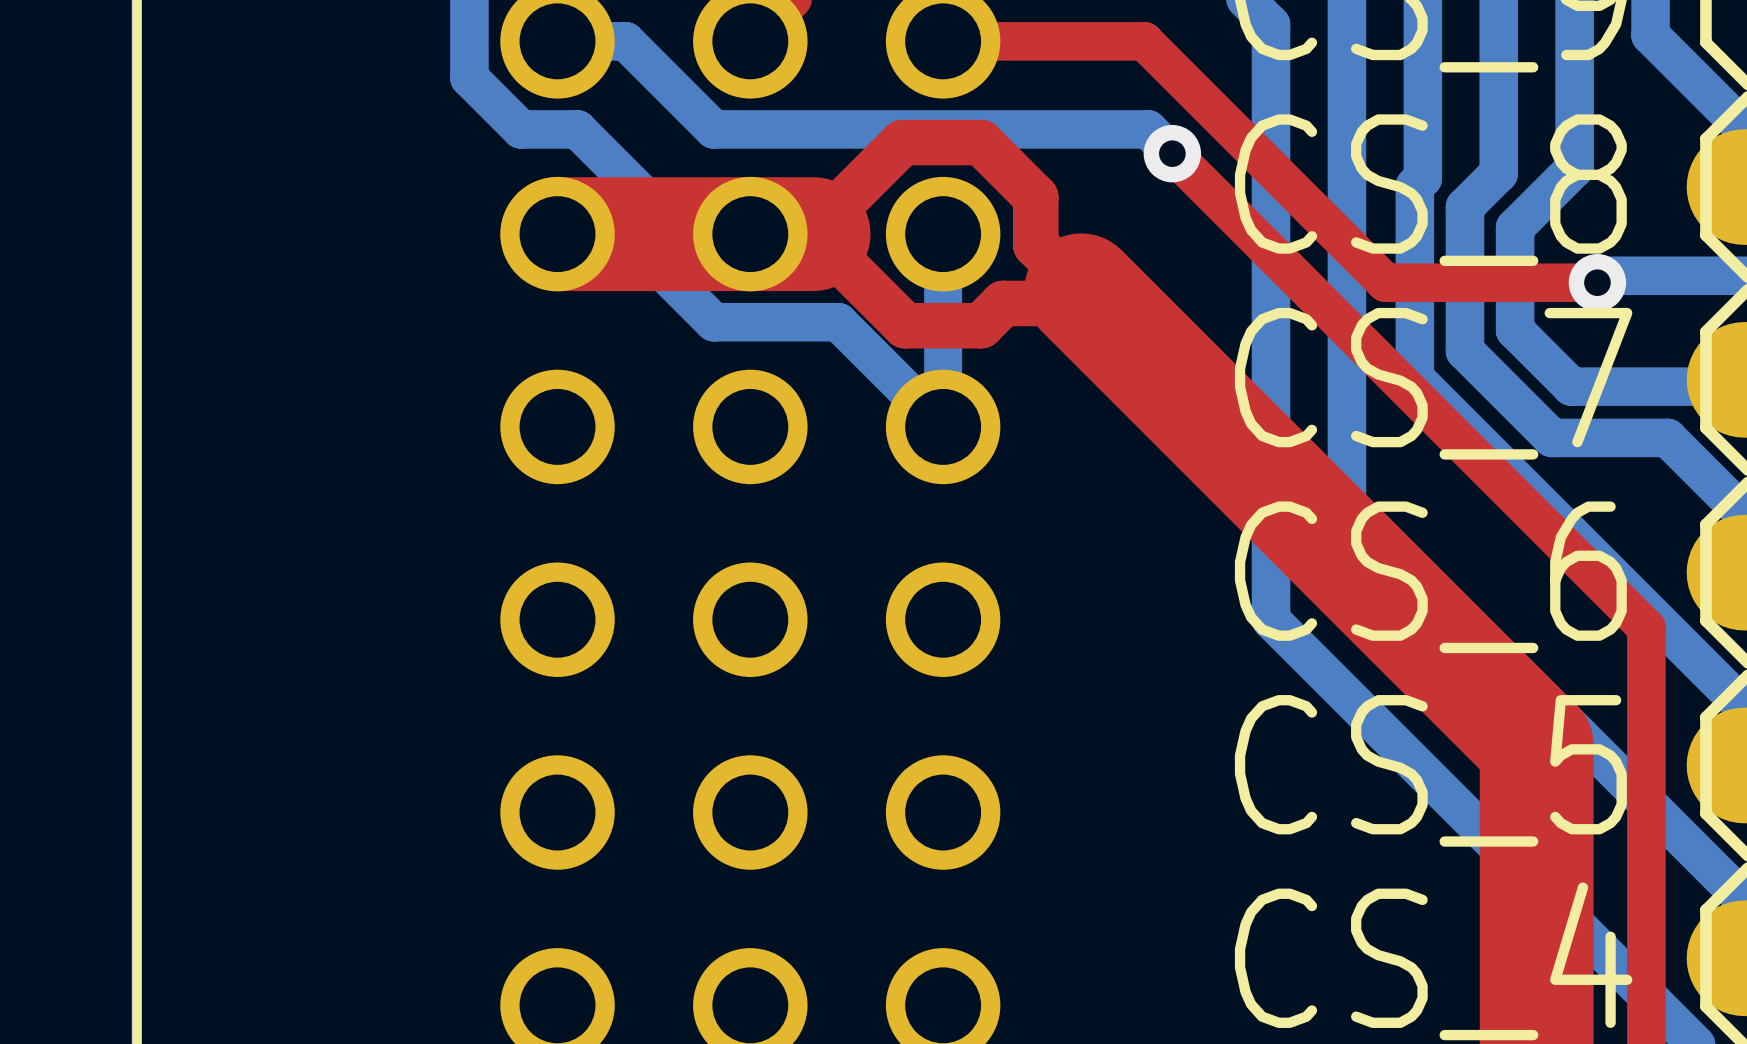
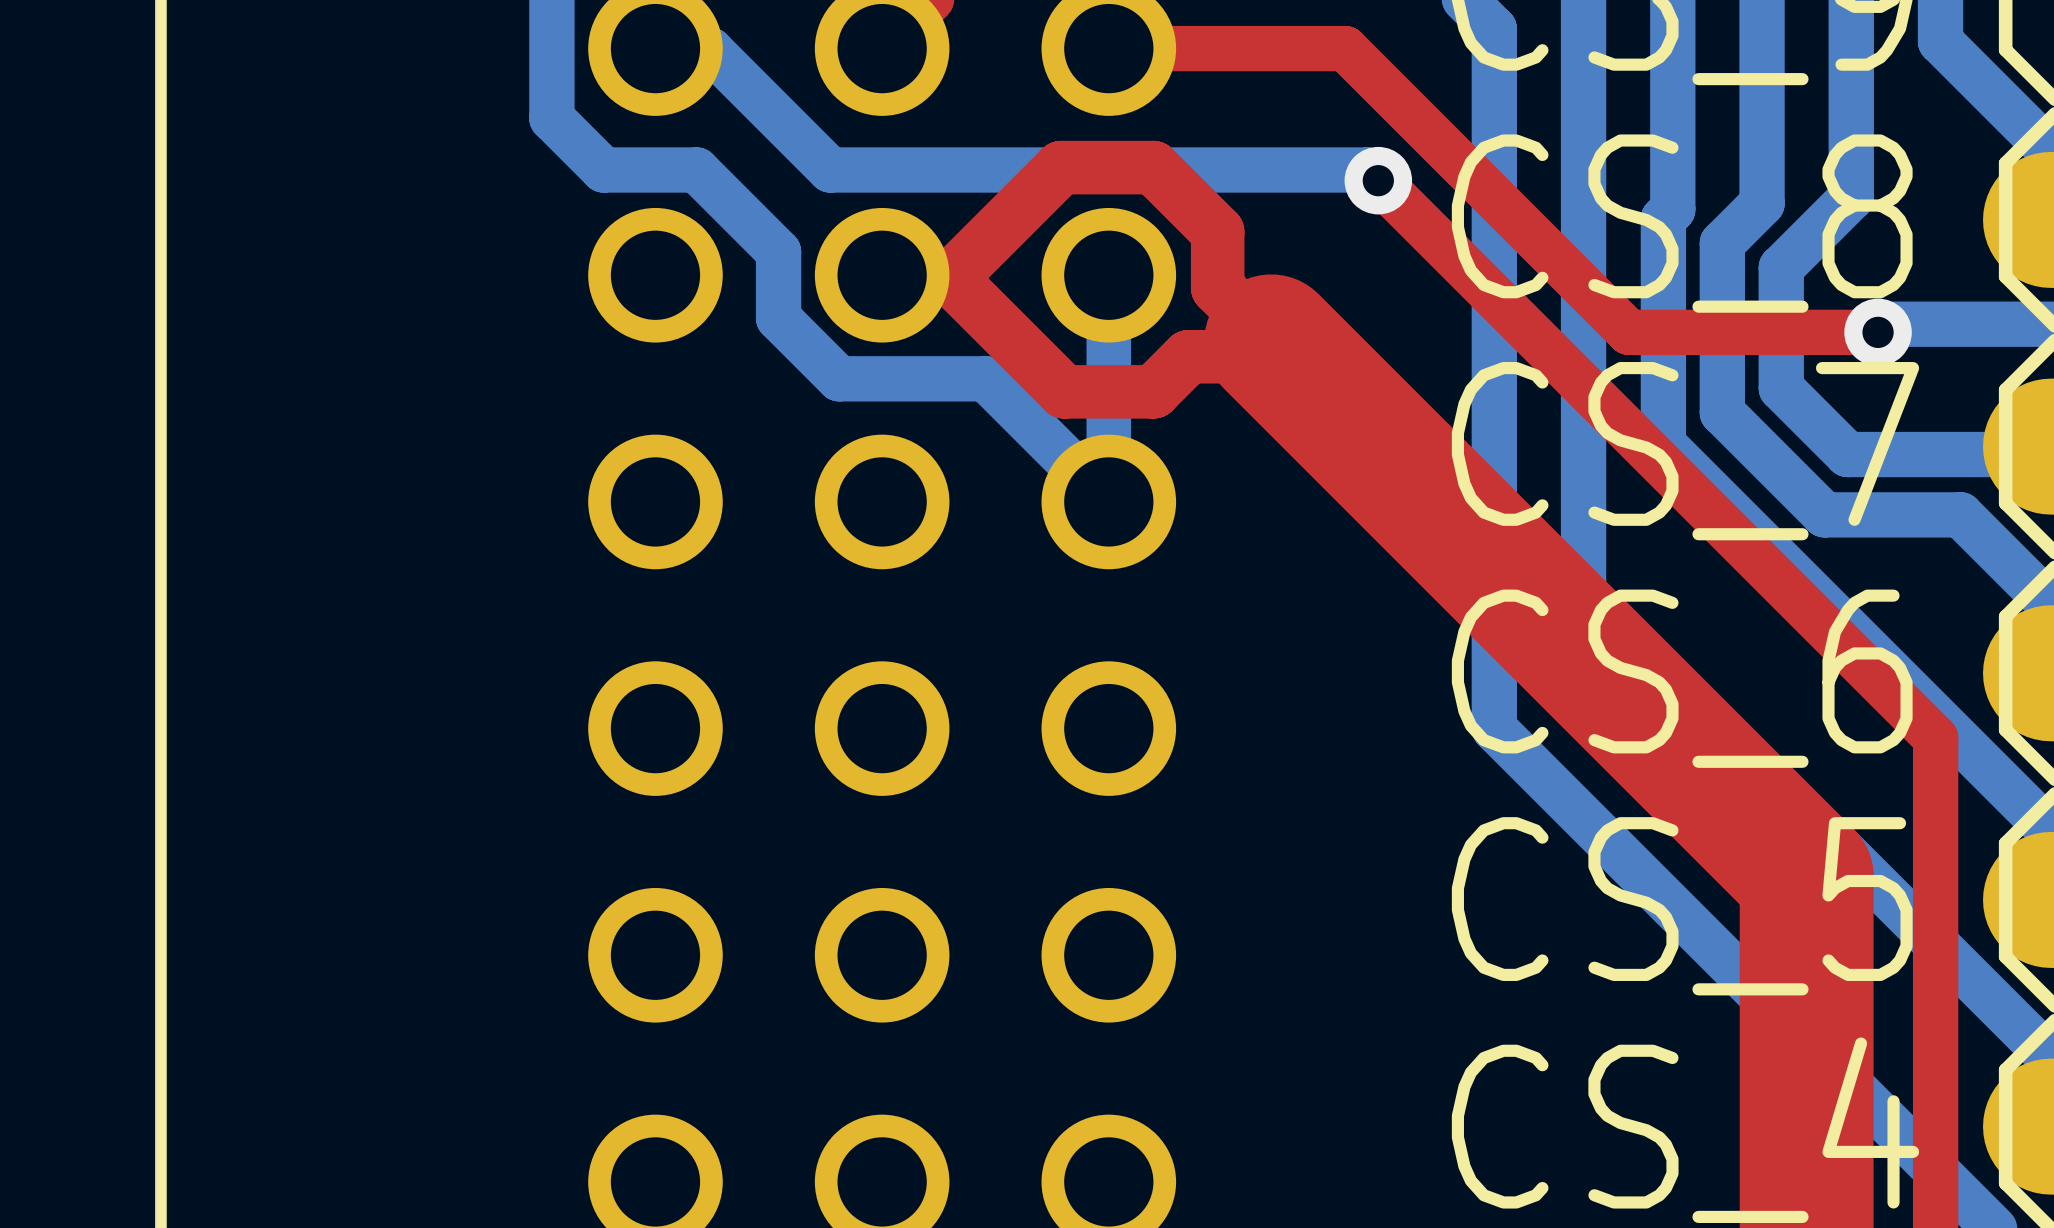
bottom track: (557, 41) (625, 41) (713, 129) (1148, 129) (1163, 144) -> (655, 53) (710, 50) (830, 170) (1367, 170)
bottom track: (469, 77) (521, 129) (577, 129) (592, 144) -> (551, 91) (551, 118) (603, 170) (696, 170)
top track: (557, 234) (813, 234) (905, 325) (981, 325) (1003, 303) (1010, 303) -> (948, 275) (1064, 391) (1153, 391) (1188, 356)

